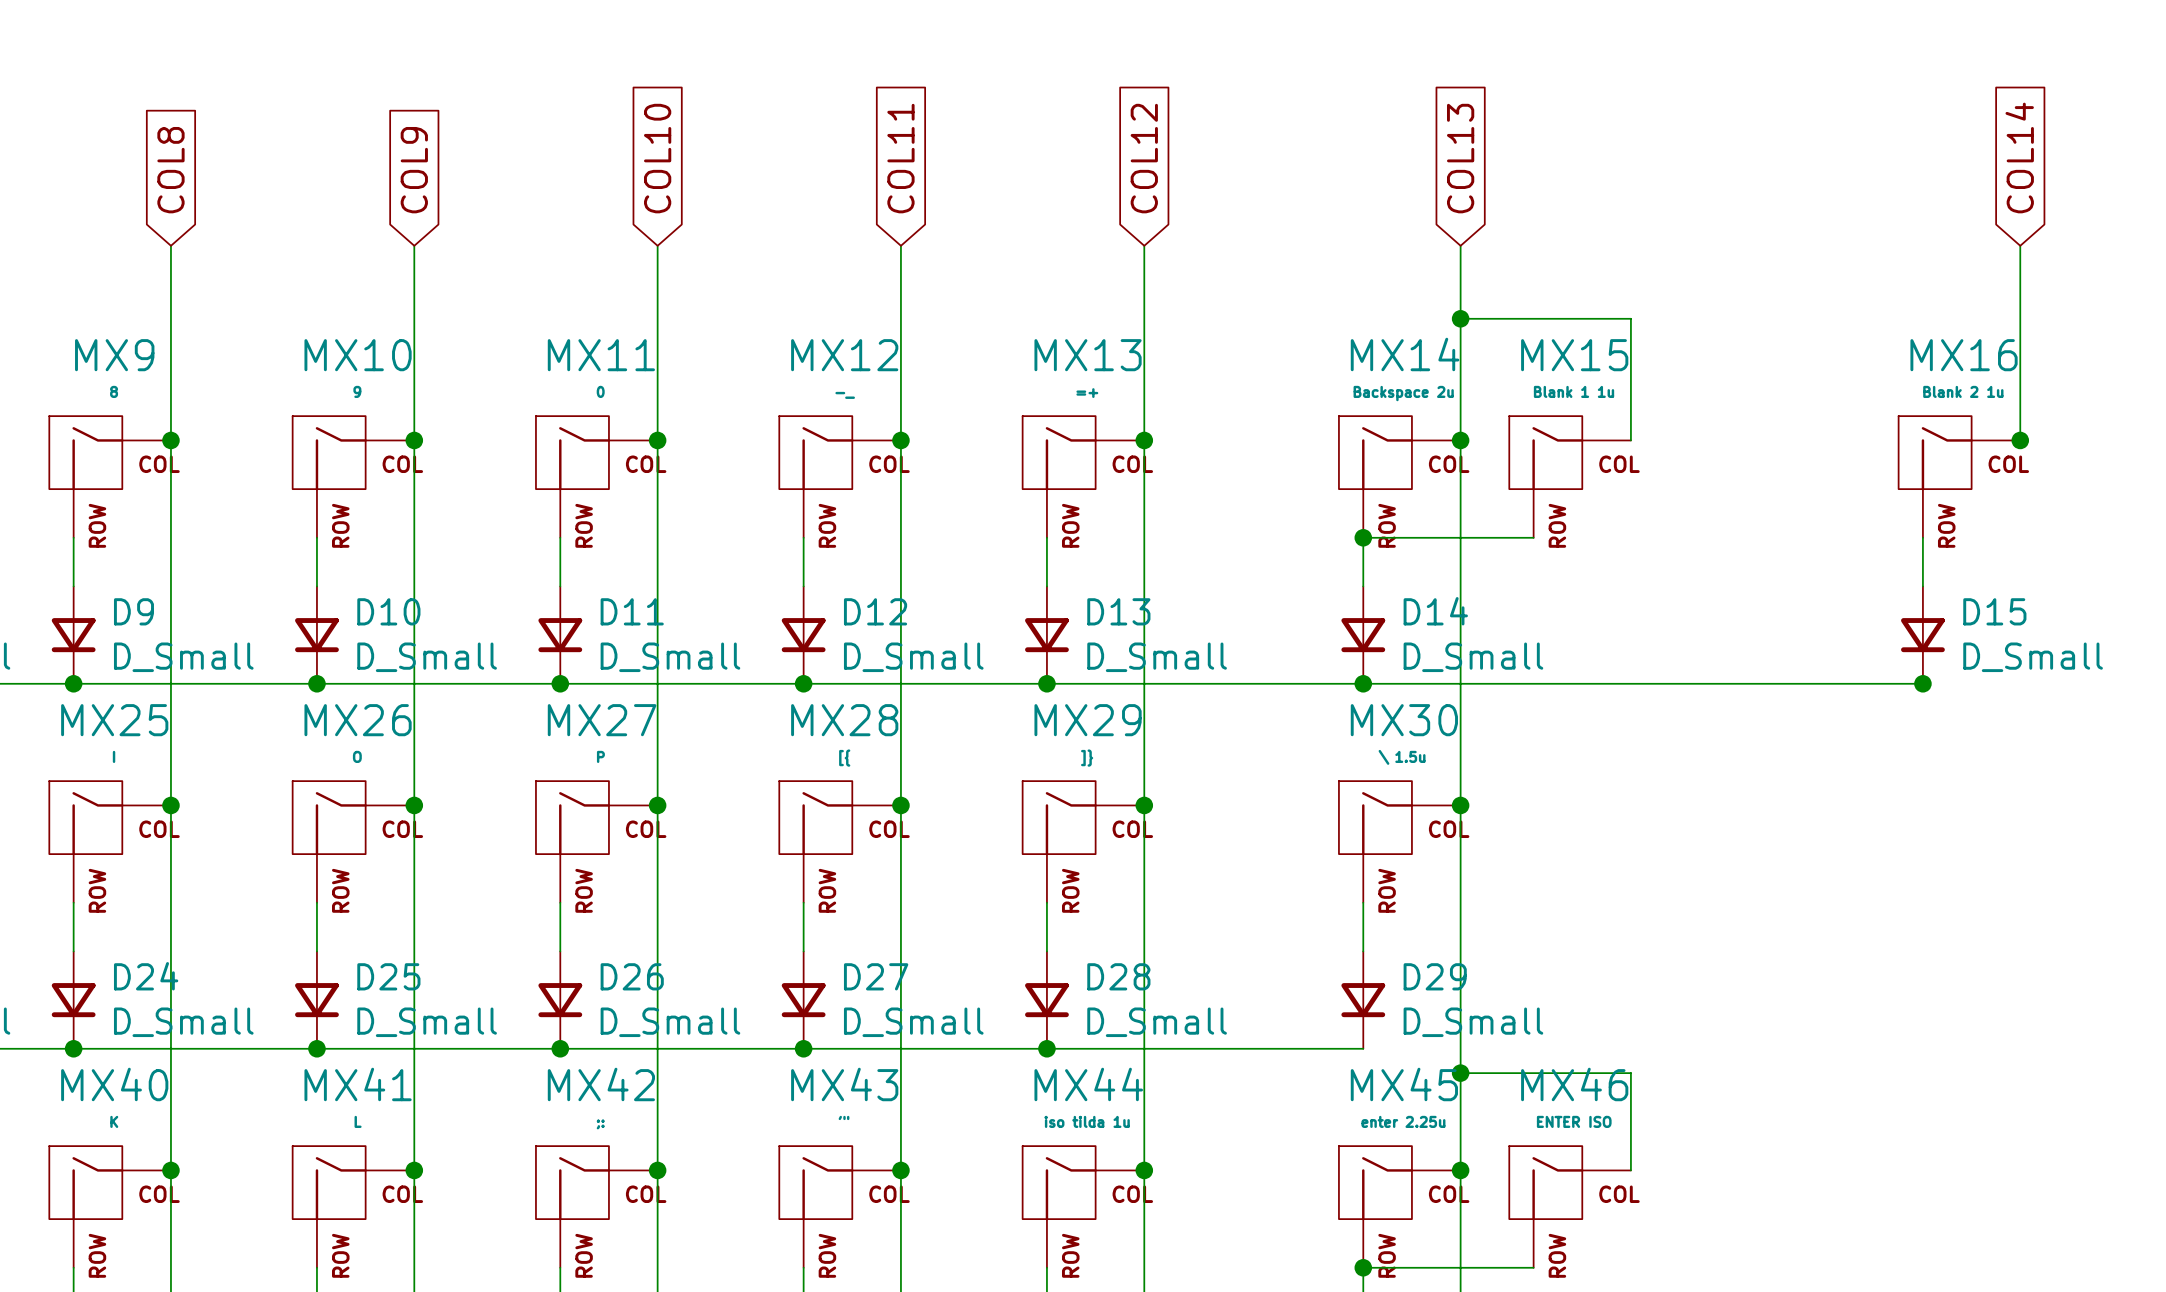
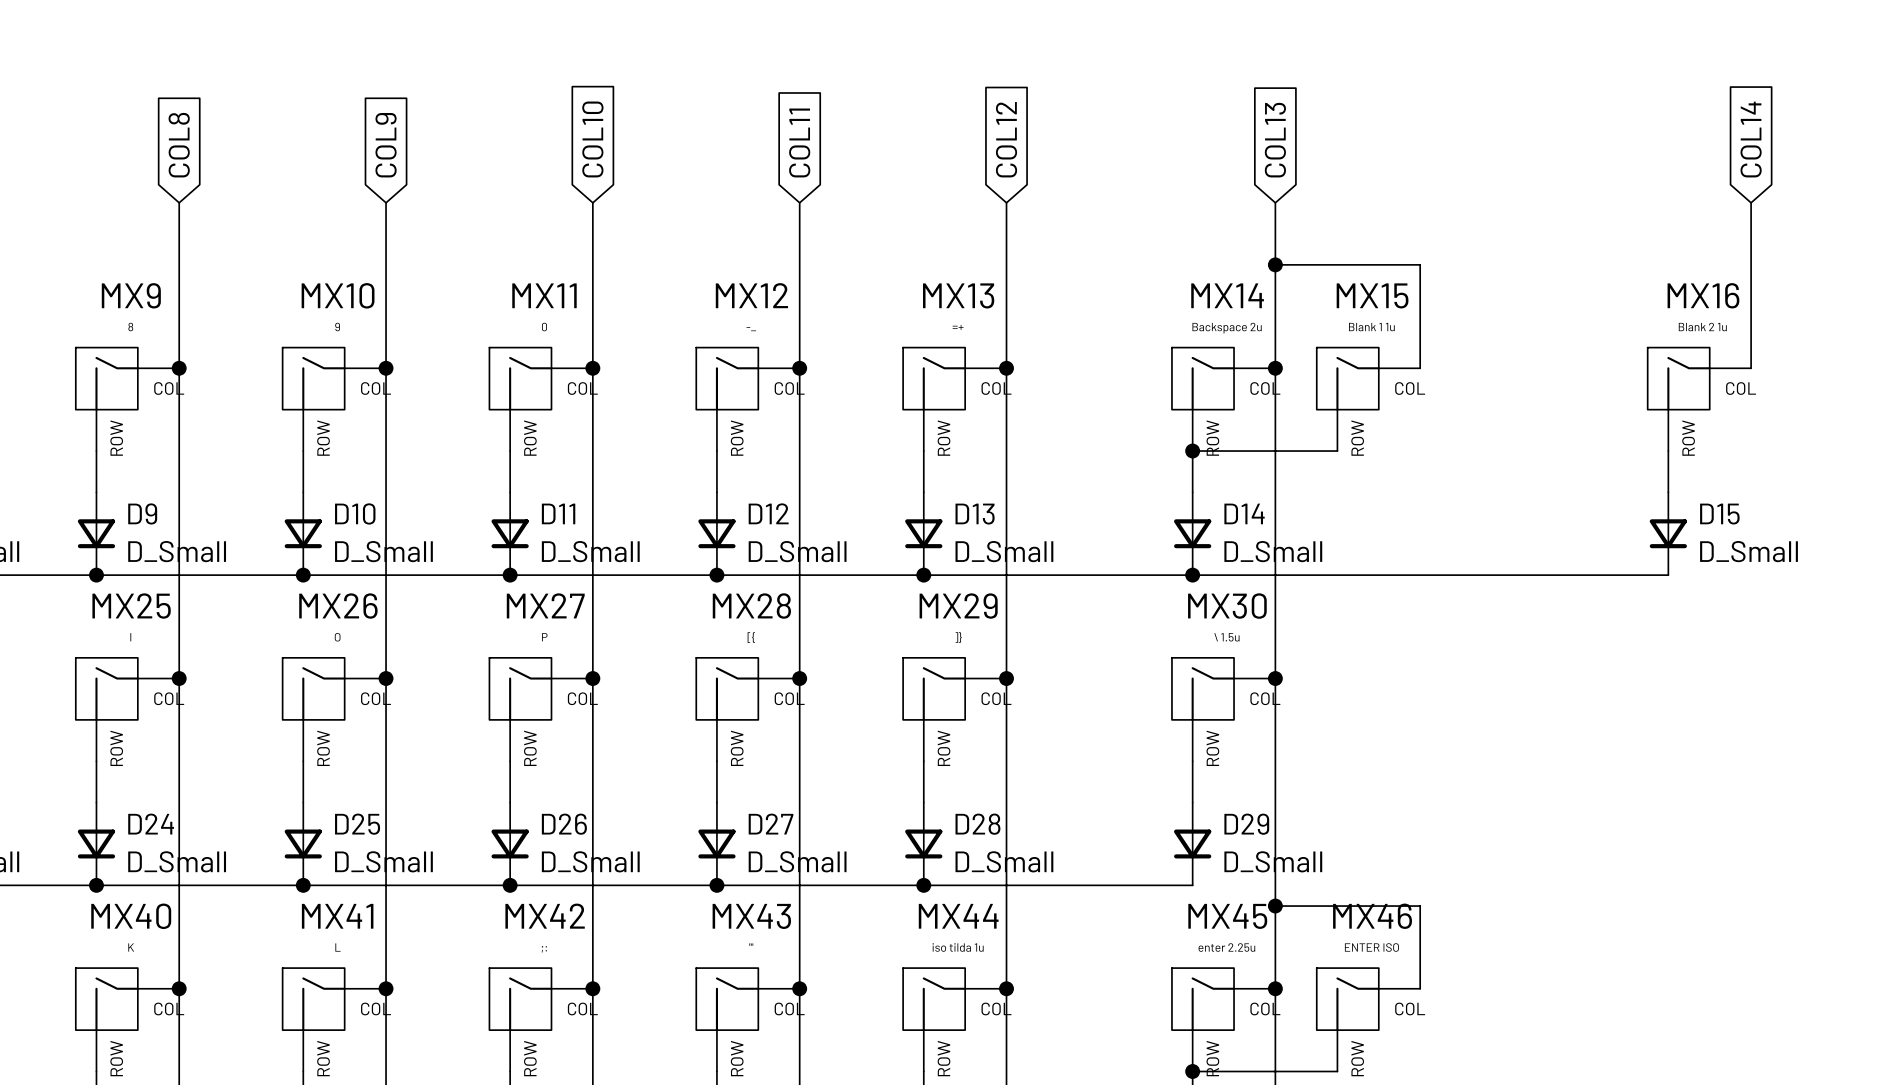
junction: (2020, 440) -> none
junction: (1922, 683) -> none

